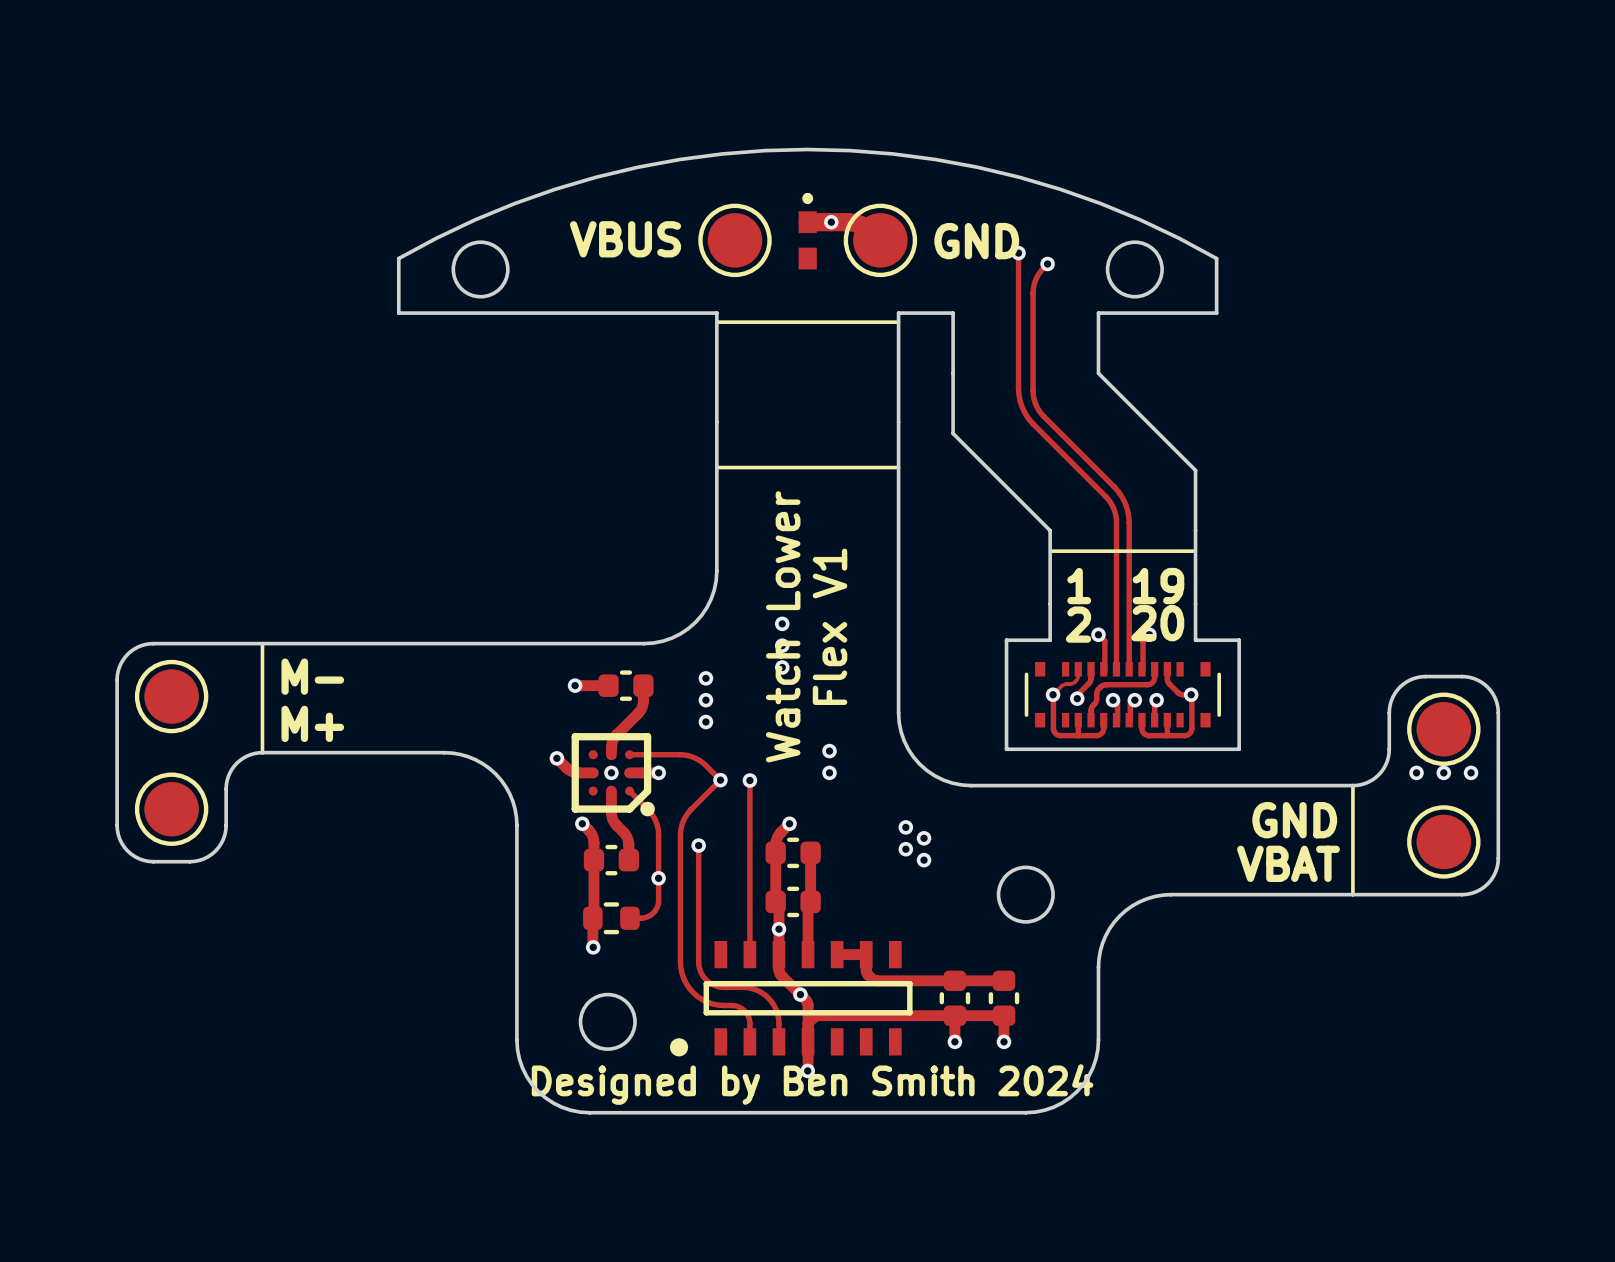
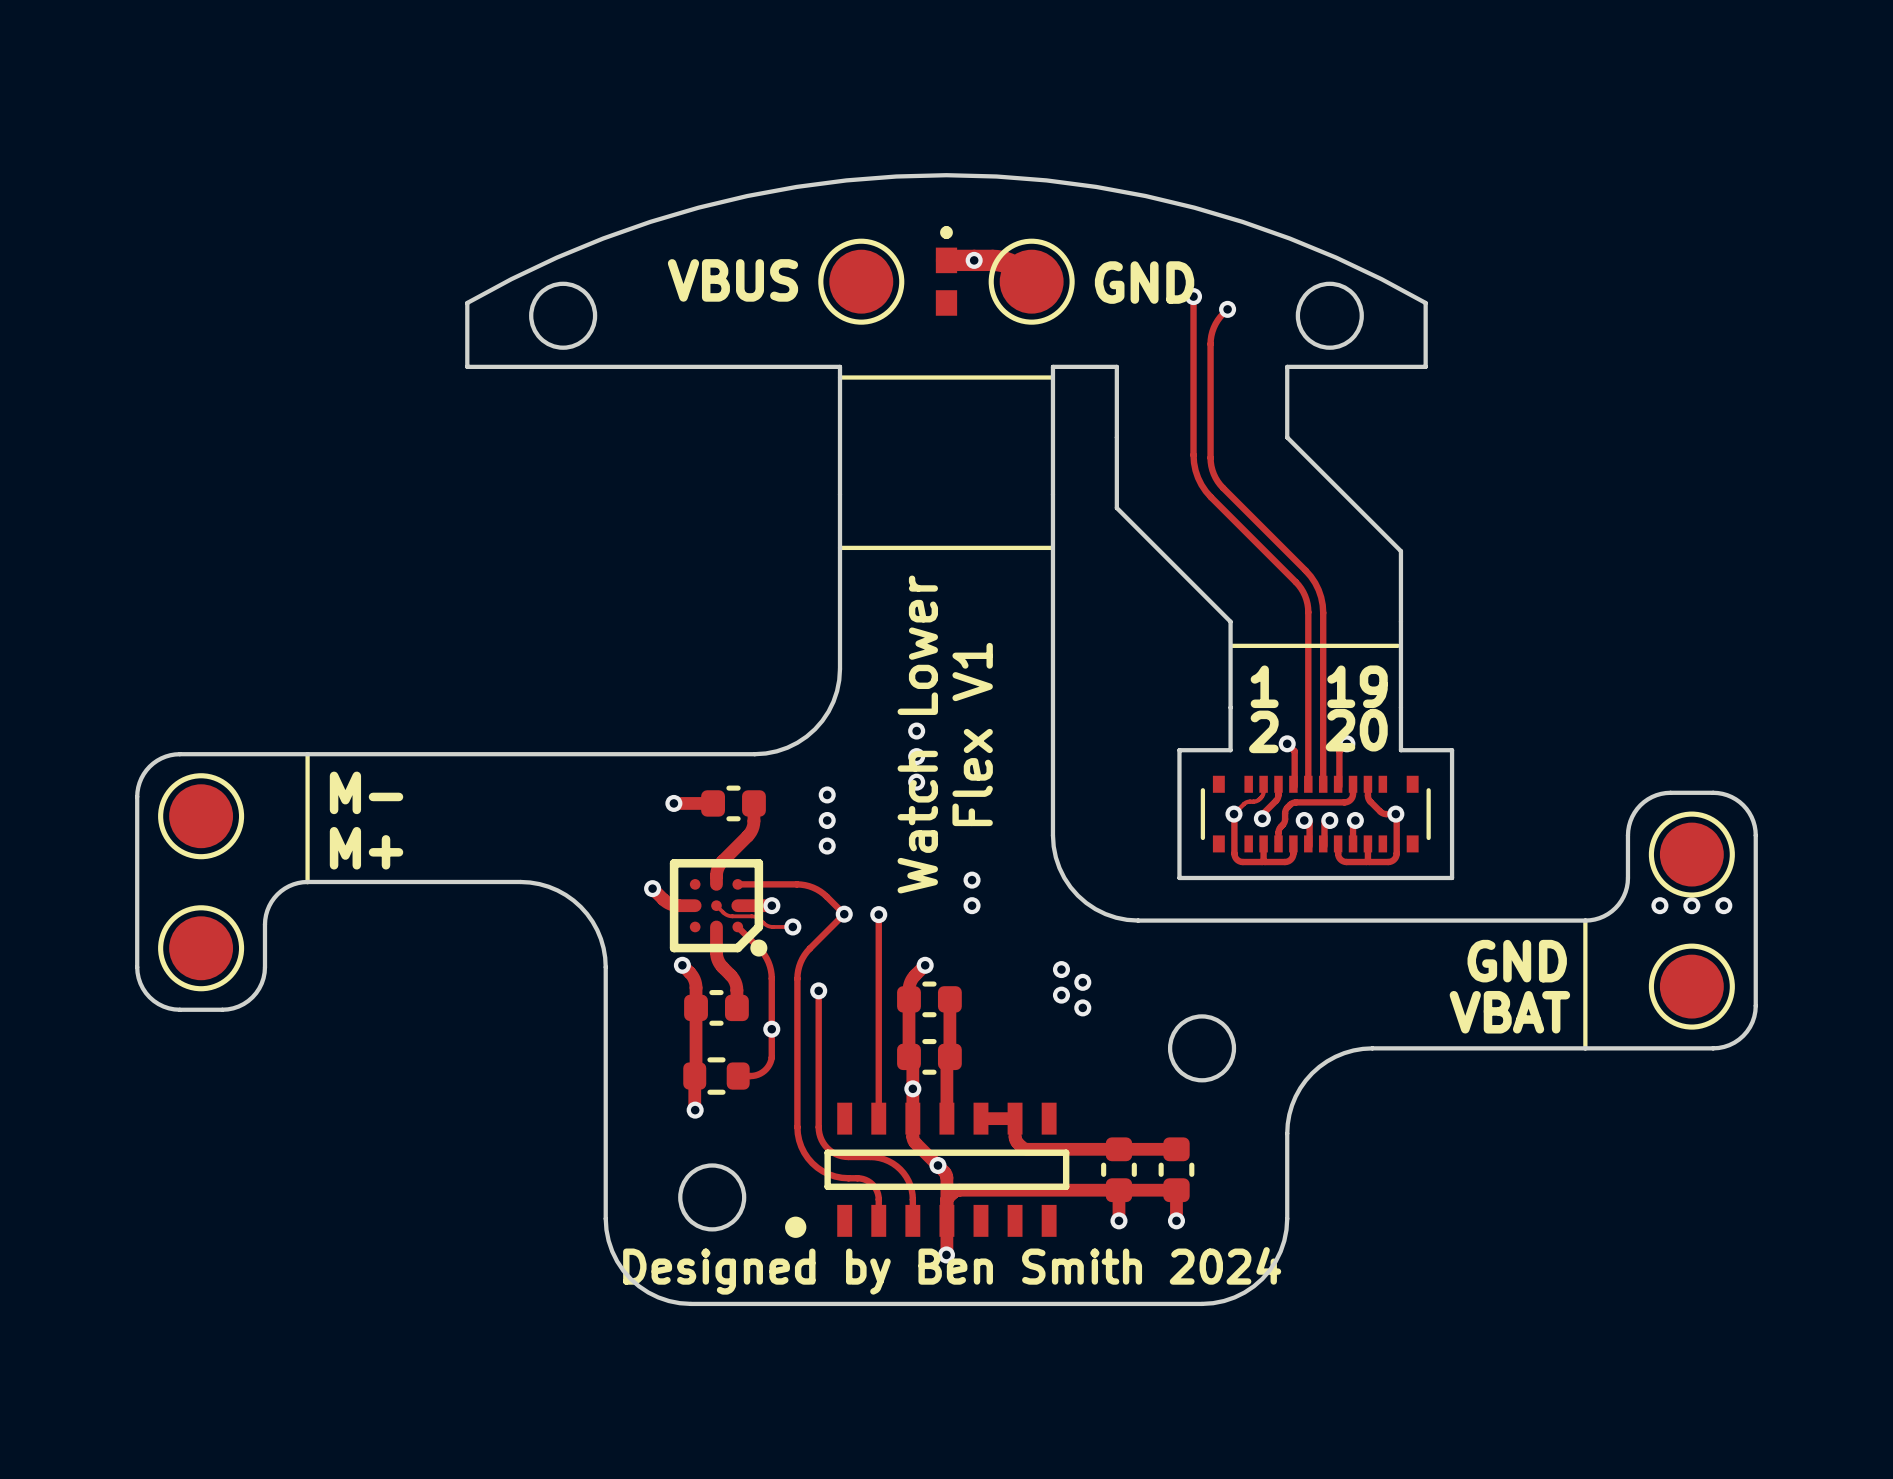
track: none -> (716, 905) (728, 915) (755, 916) (770, 926) (792, 926)
via position: (611, 772) -> (792, 926)

